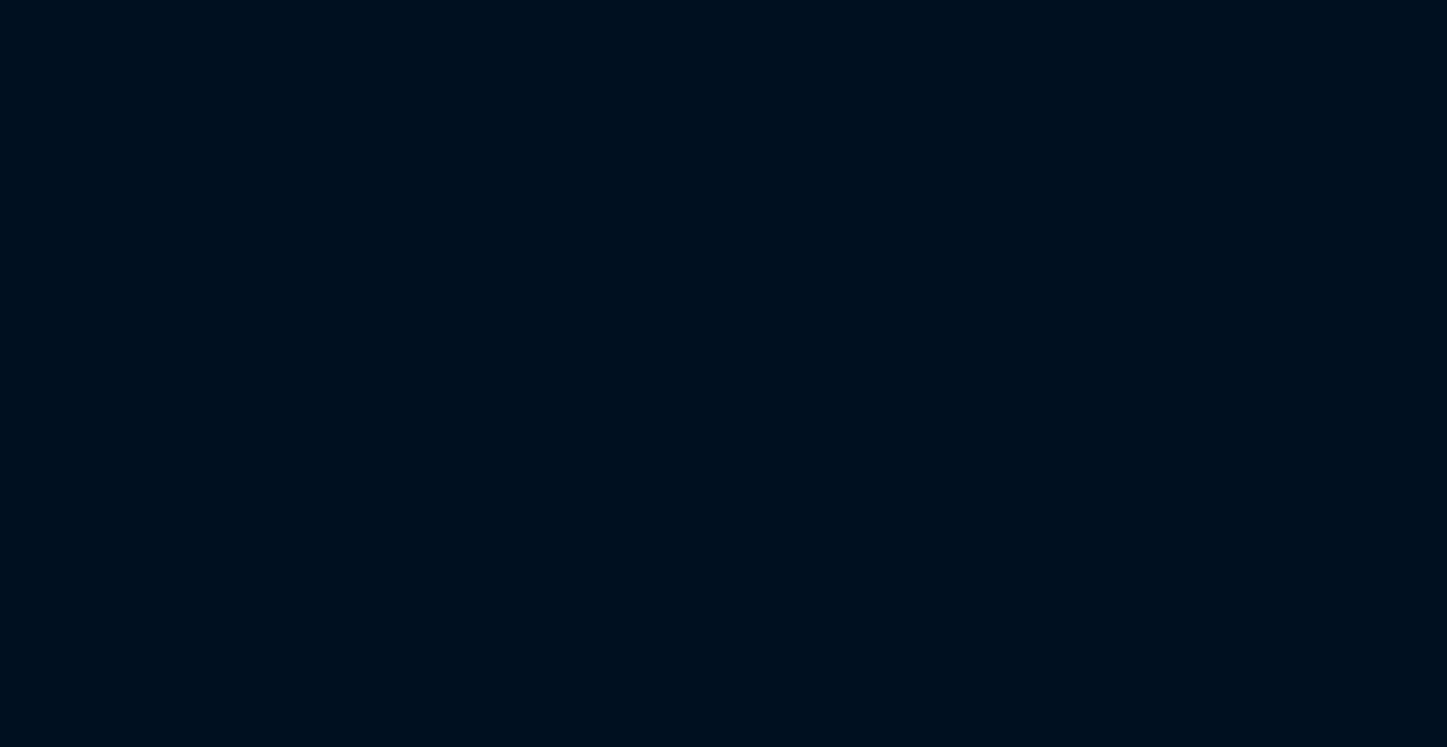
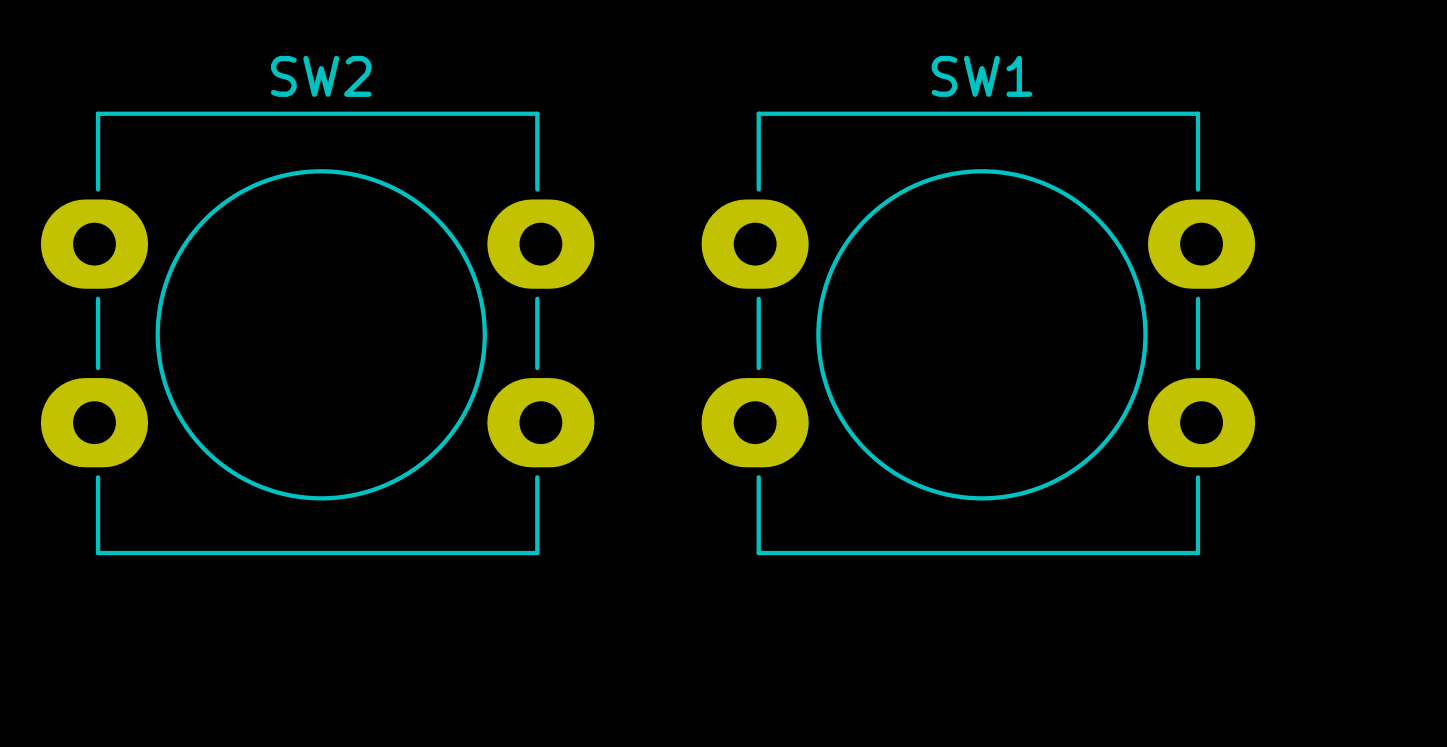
SW2: none -> (317, 333)
SW1: none -> (978, 333)

